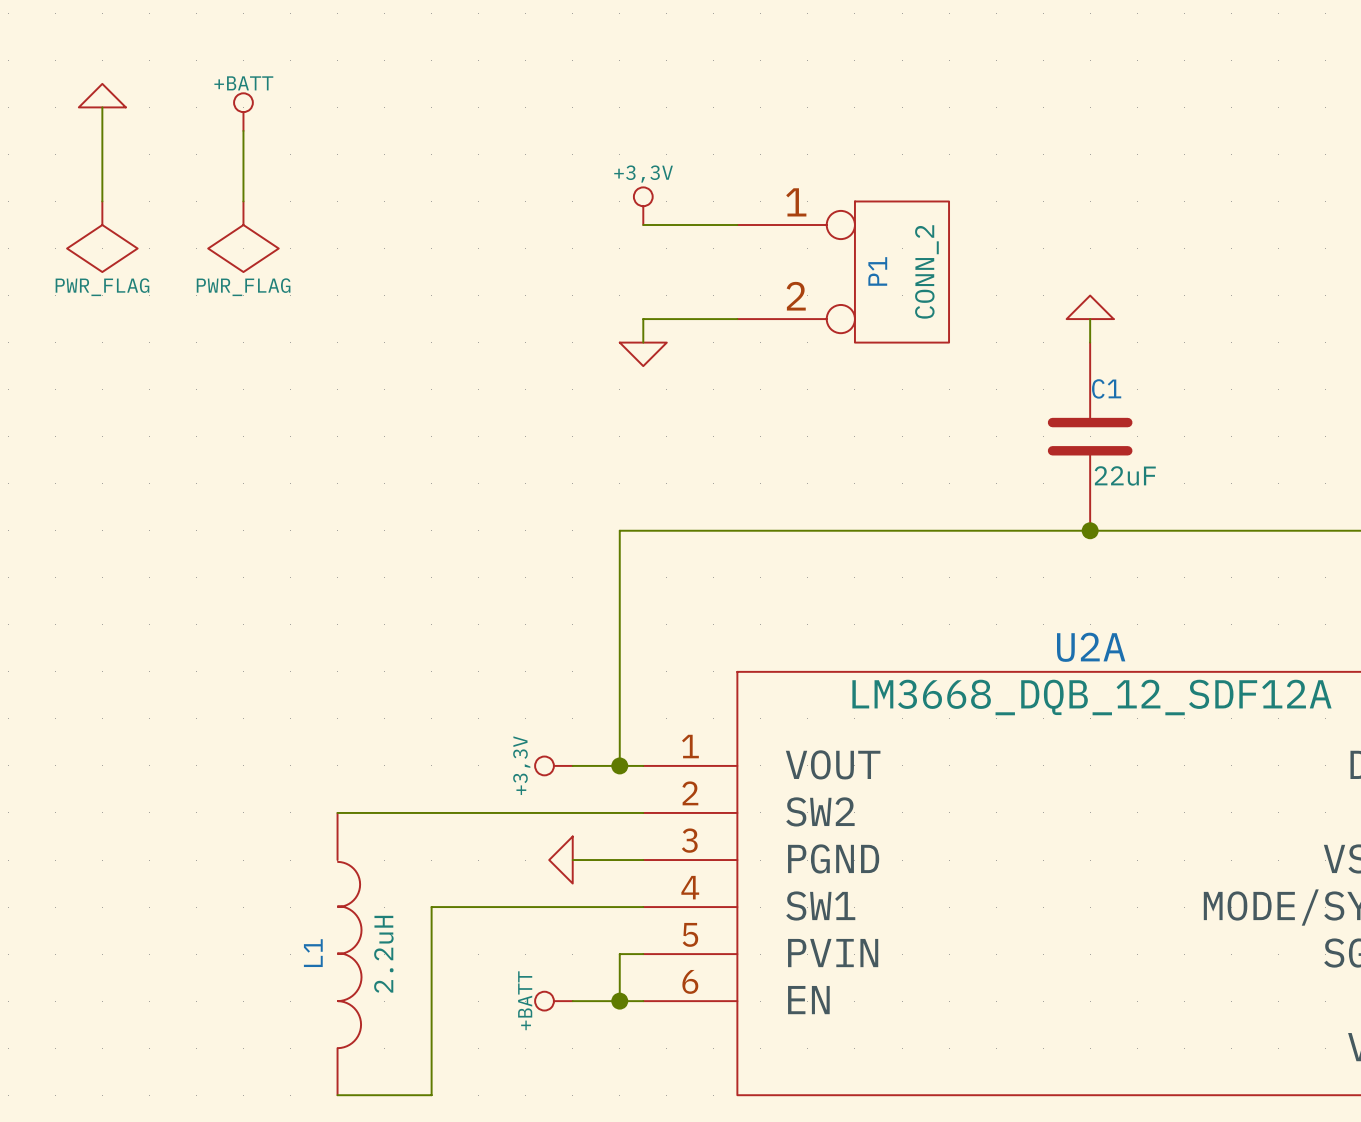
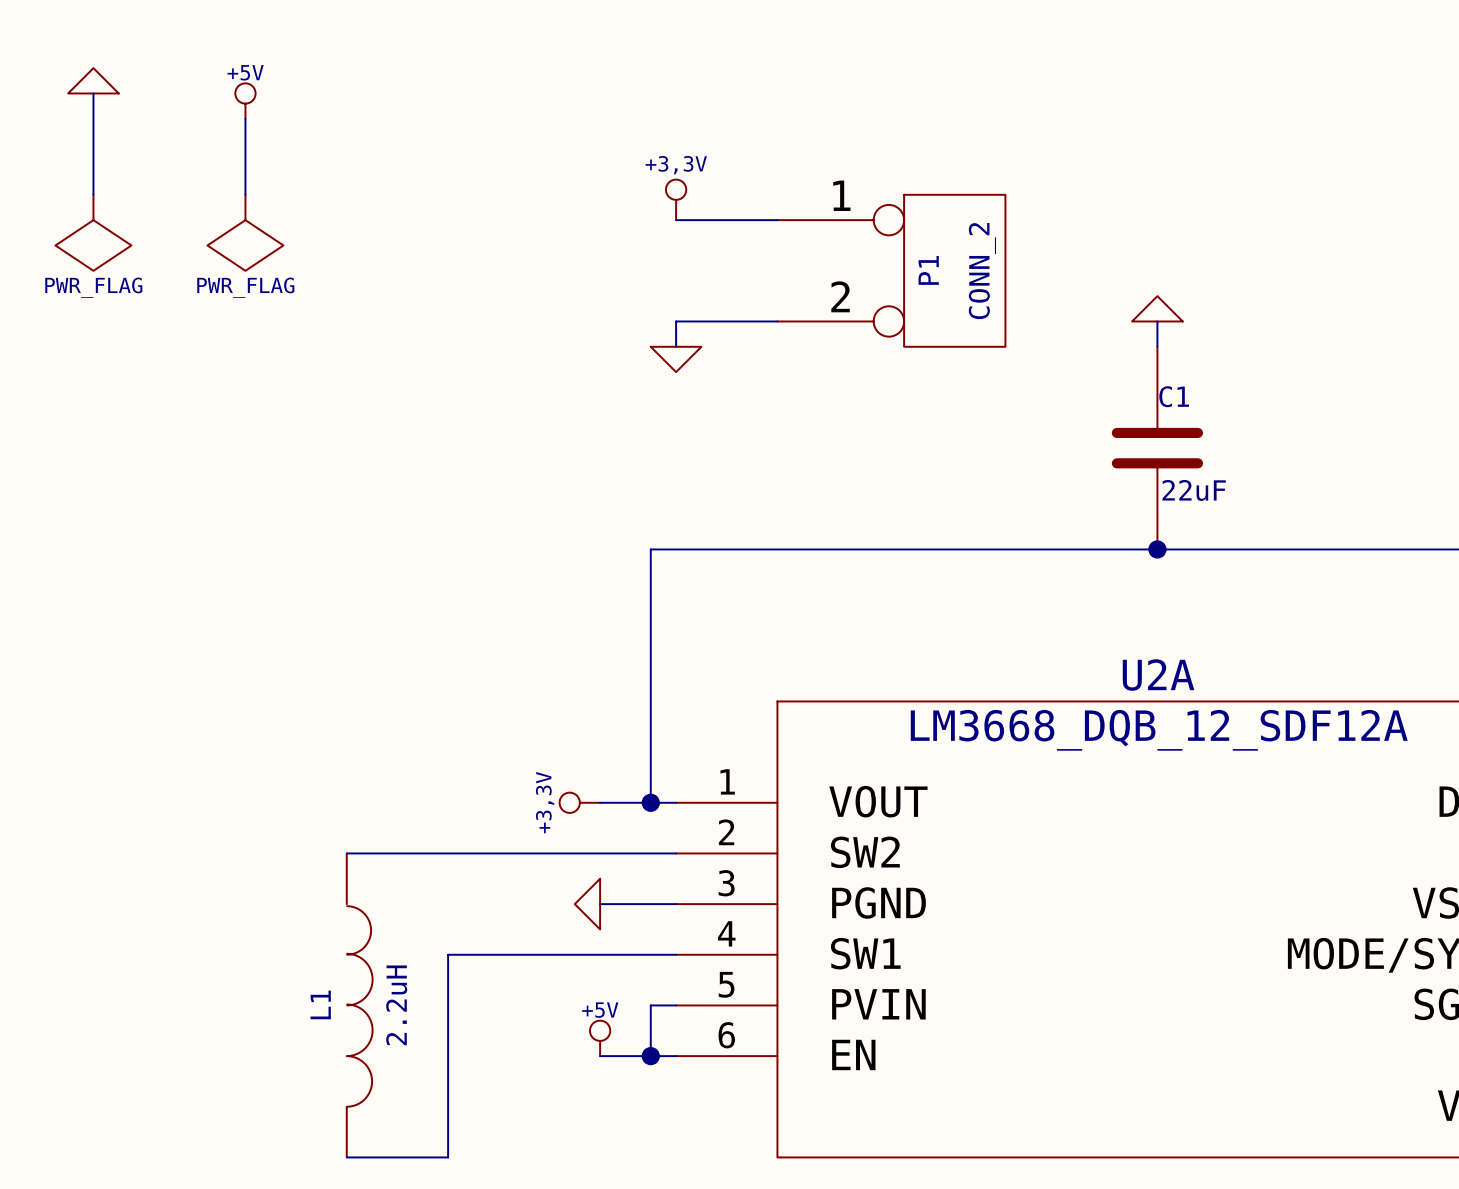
power symbol: +BATT (243, 112) -> +5V (245, 101)
power symbol: none -> +5V (600, 1038)
power symbol: +BATT (553, 1001) -> none

